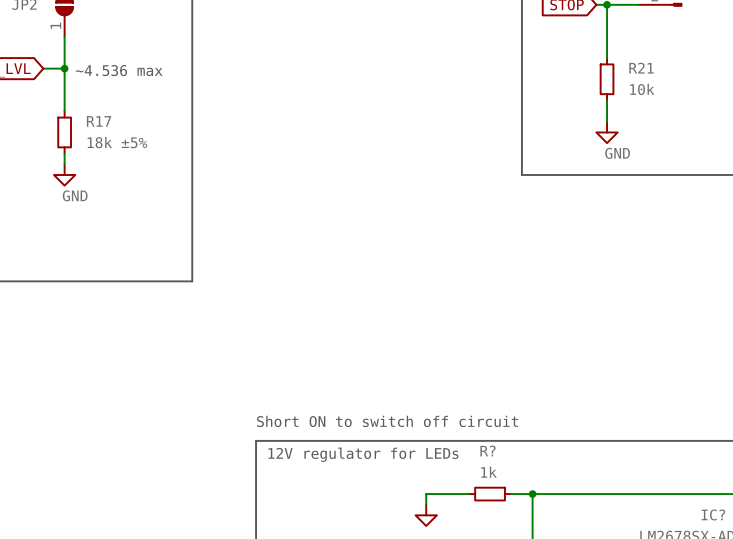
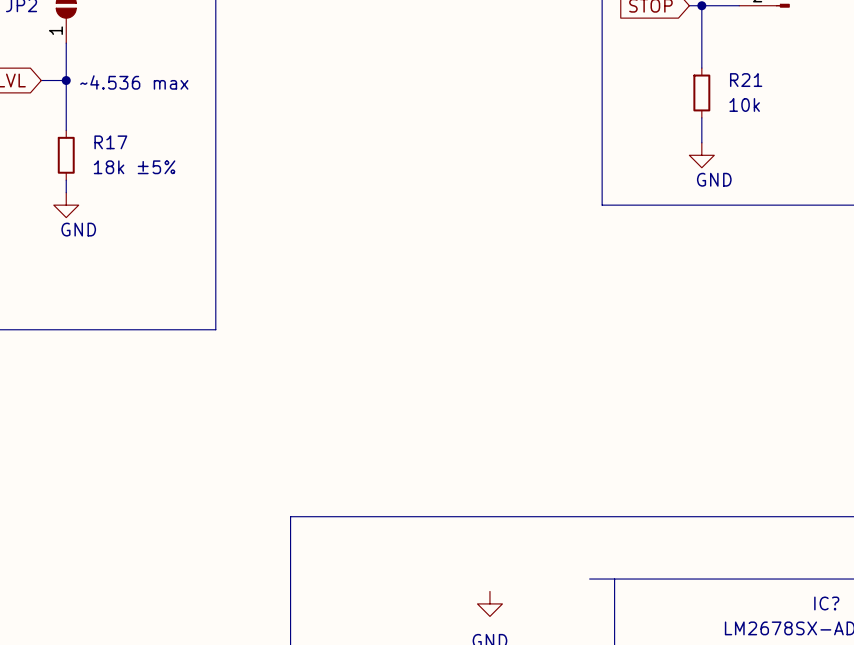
text: Short ON to switch off circuit (387, 421) -> none
text: 12V regulator for LEDs (363, 454) -> none
wire: (468, 494) (426, 494) (426, 504) -> none
R?: 1k (490, 494) -> none
junction: (532, 494) -> none

